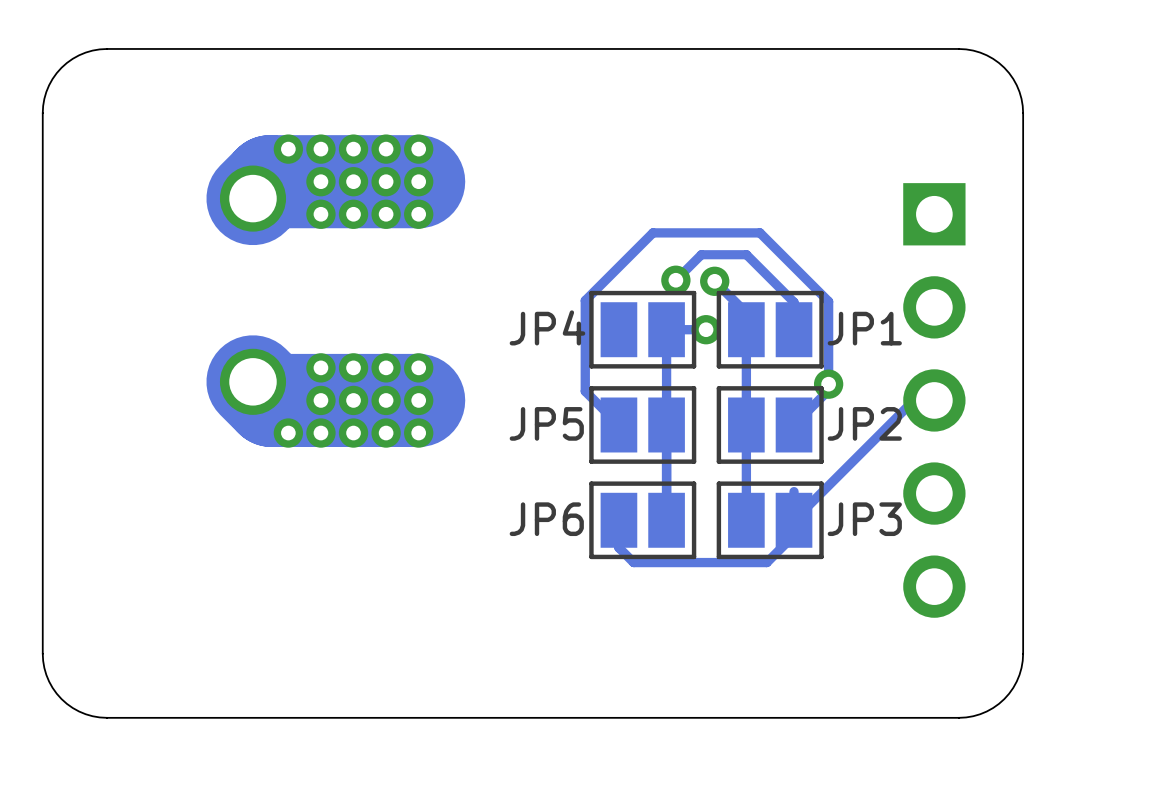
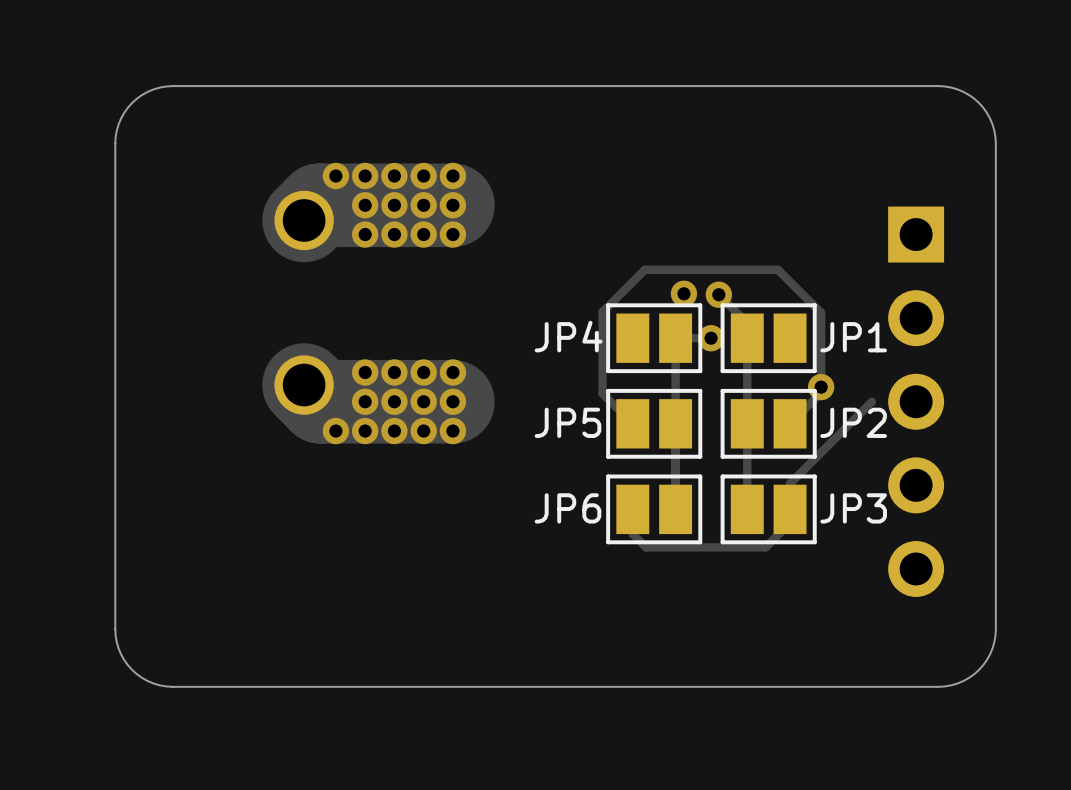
track: (780, 253) (759, 232) (652, 232) (632, 253) -> (778, 269) (644, 269)
track: (675, 280) (701, 254) (746, 254) (794, 302) (794, 329) -> none
track: none -> (871, 401) (790, 483)
track: (934, 400) (913, 400) (794, 520) -> none

